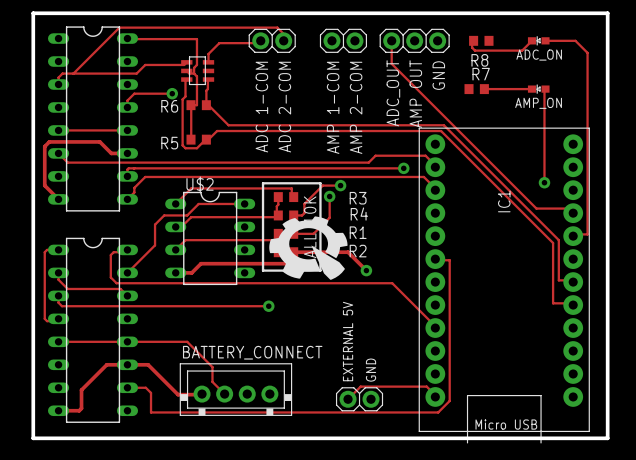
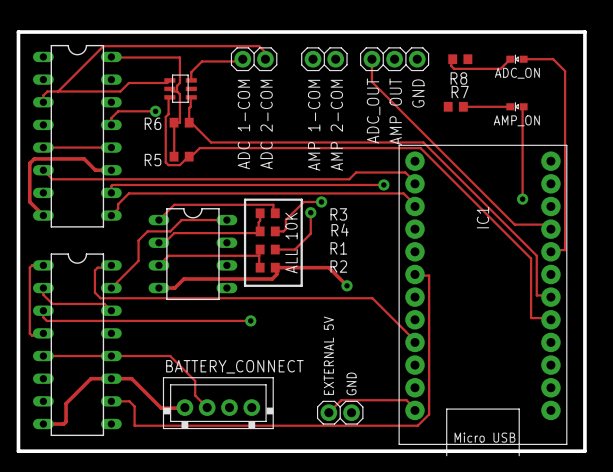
U$2 name: U$2 (200, 184) -> none
drawing: [269, 216, 348, 280] -> none

